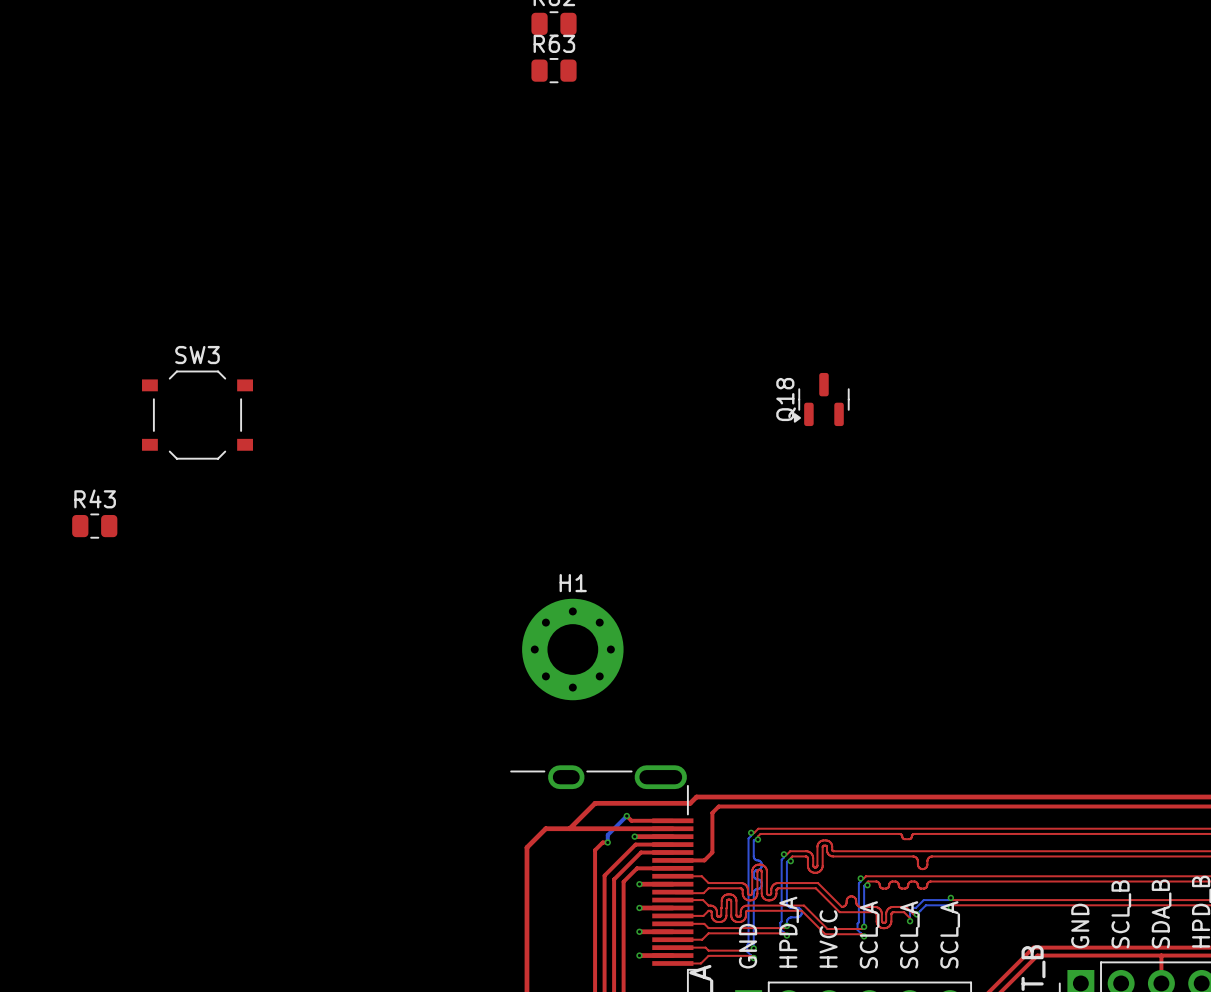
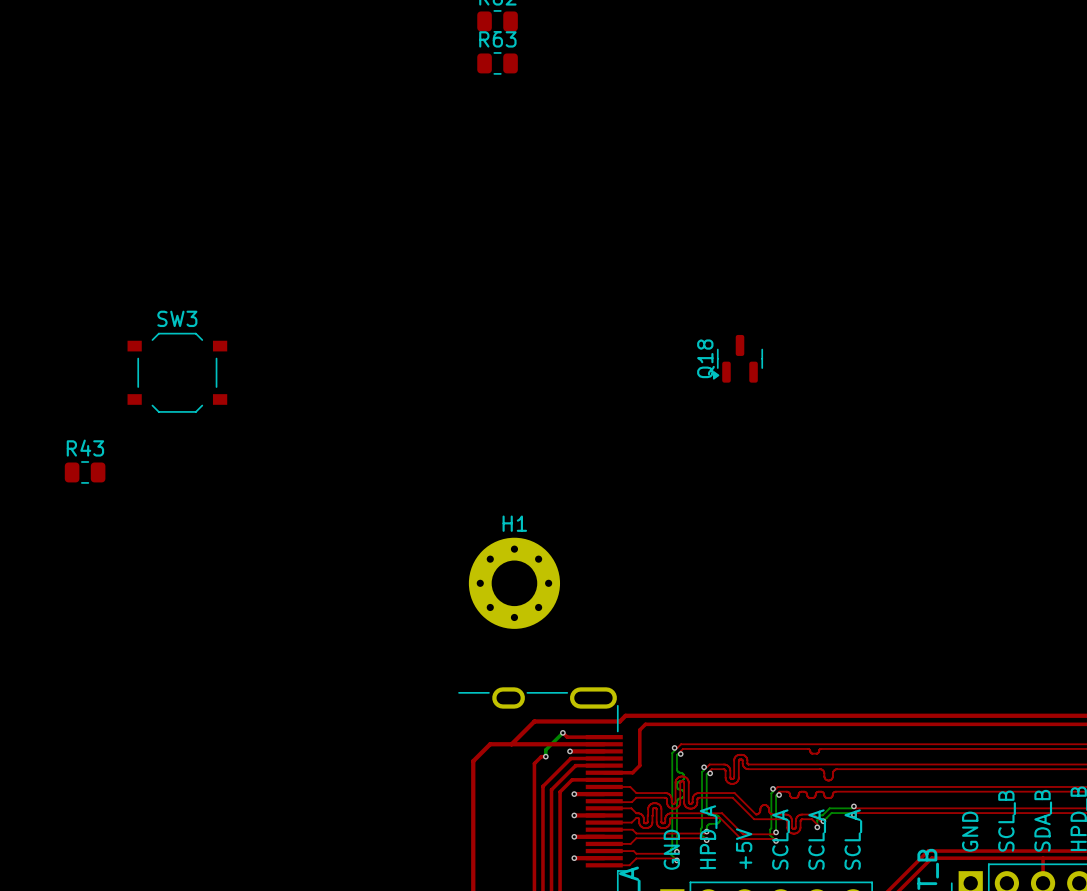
part text: HVCC (828, 938) -> +5V (744, 848)

